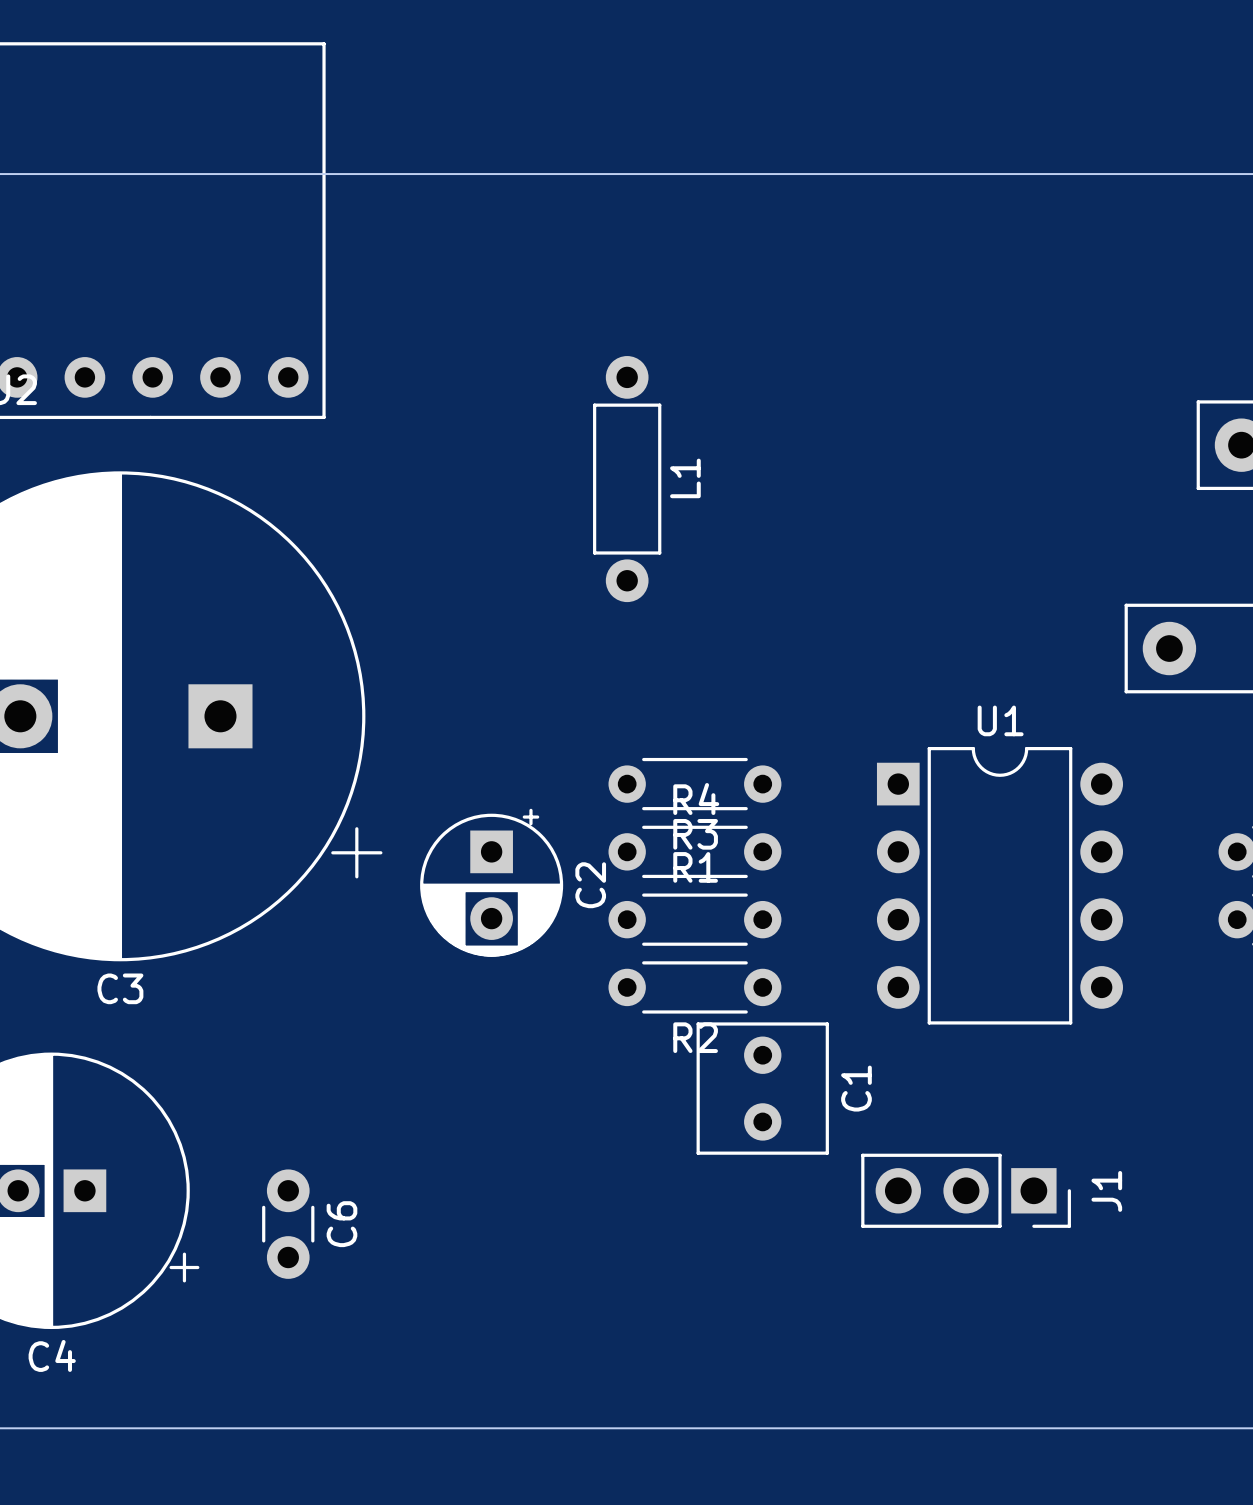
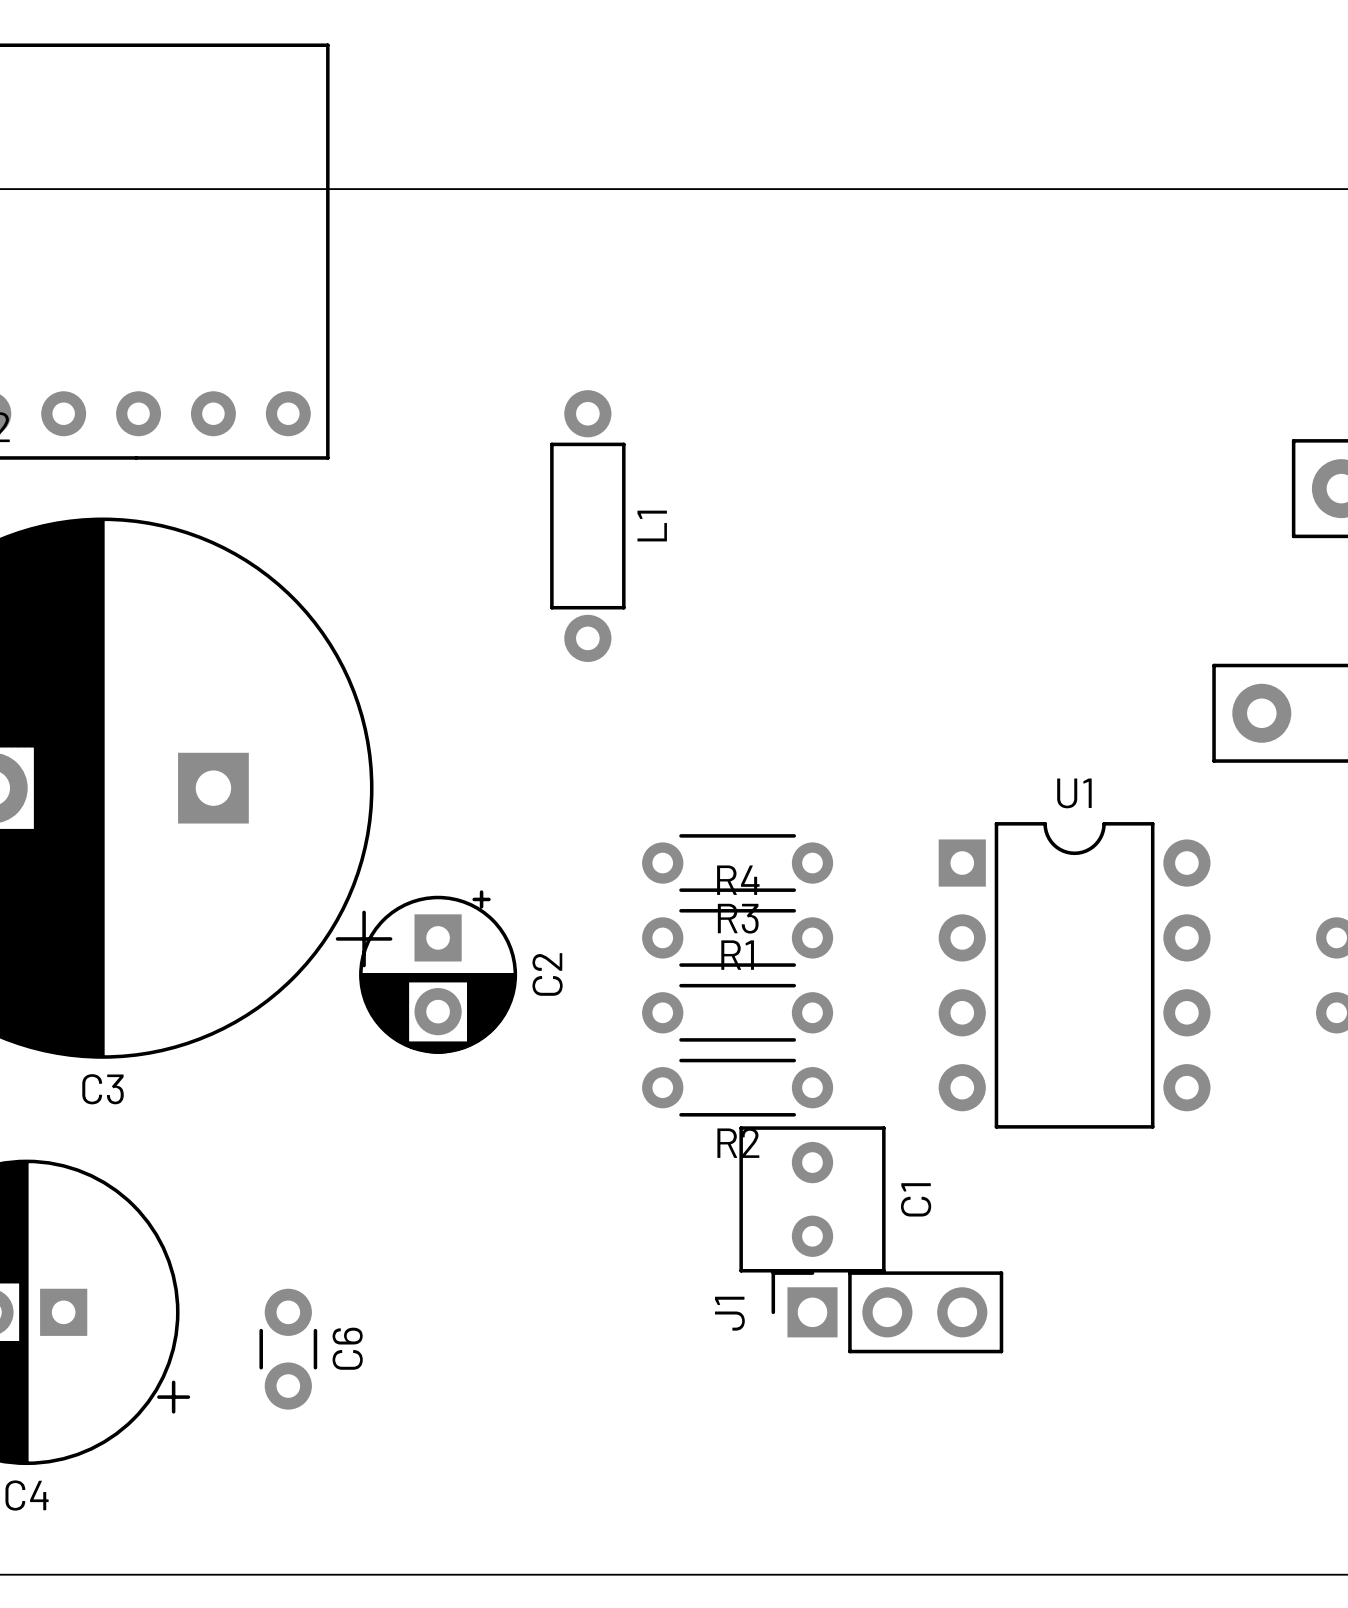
L1 position: (627, 479) -> (587, 526)
C2 position: (491, 882) -> (438, 972)
J1 rotation: 0° (966, 1190) -> 180° (887, 1312)
J1 position: (966, 1190) -> (887, 1312)

